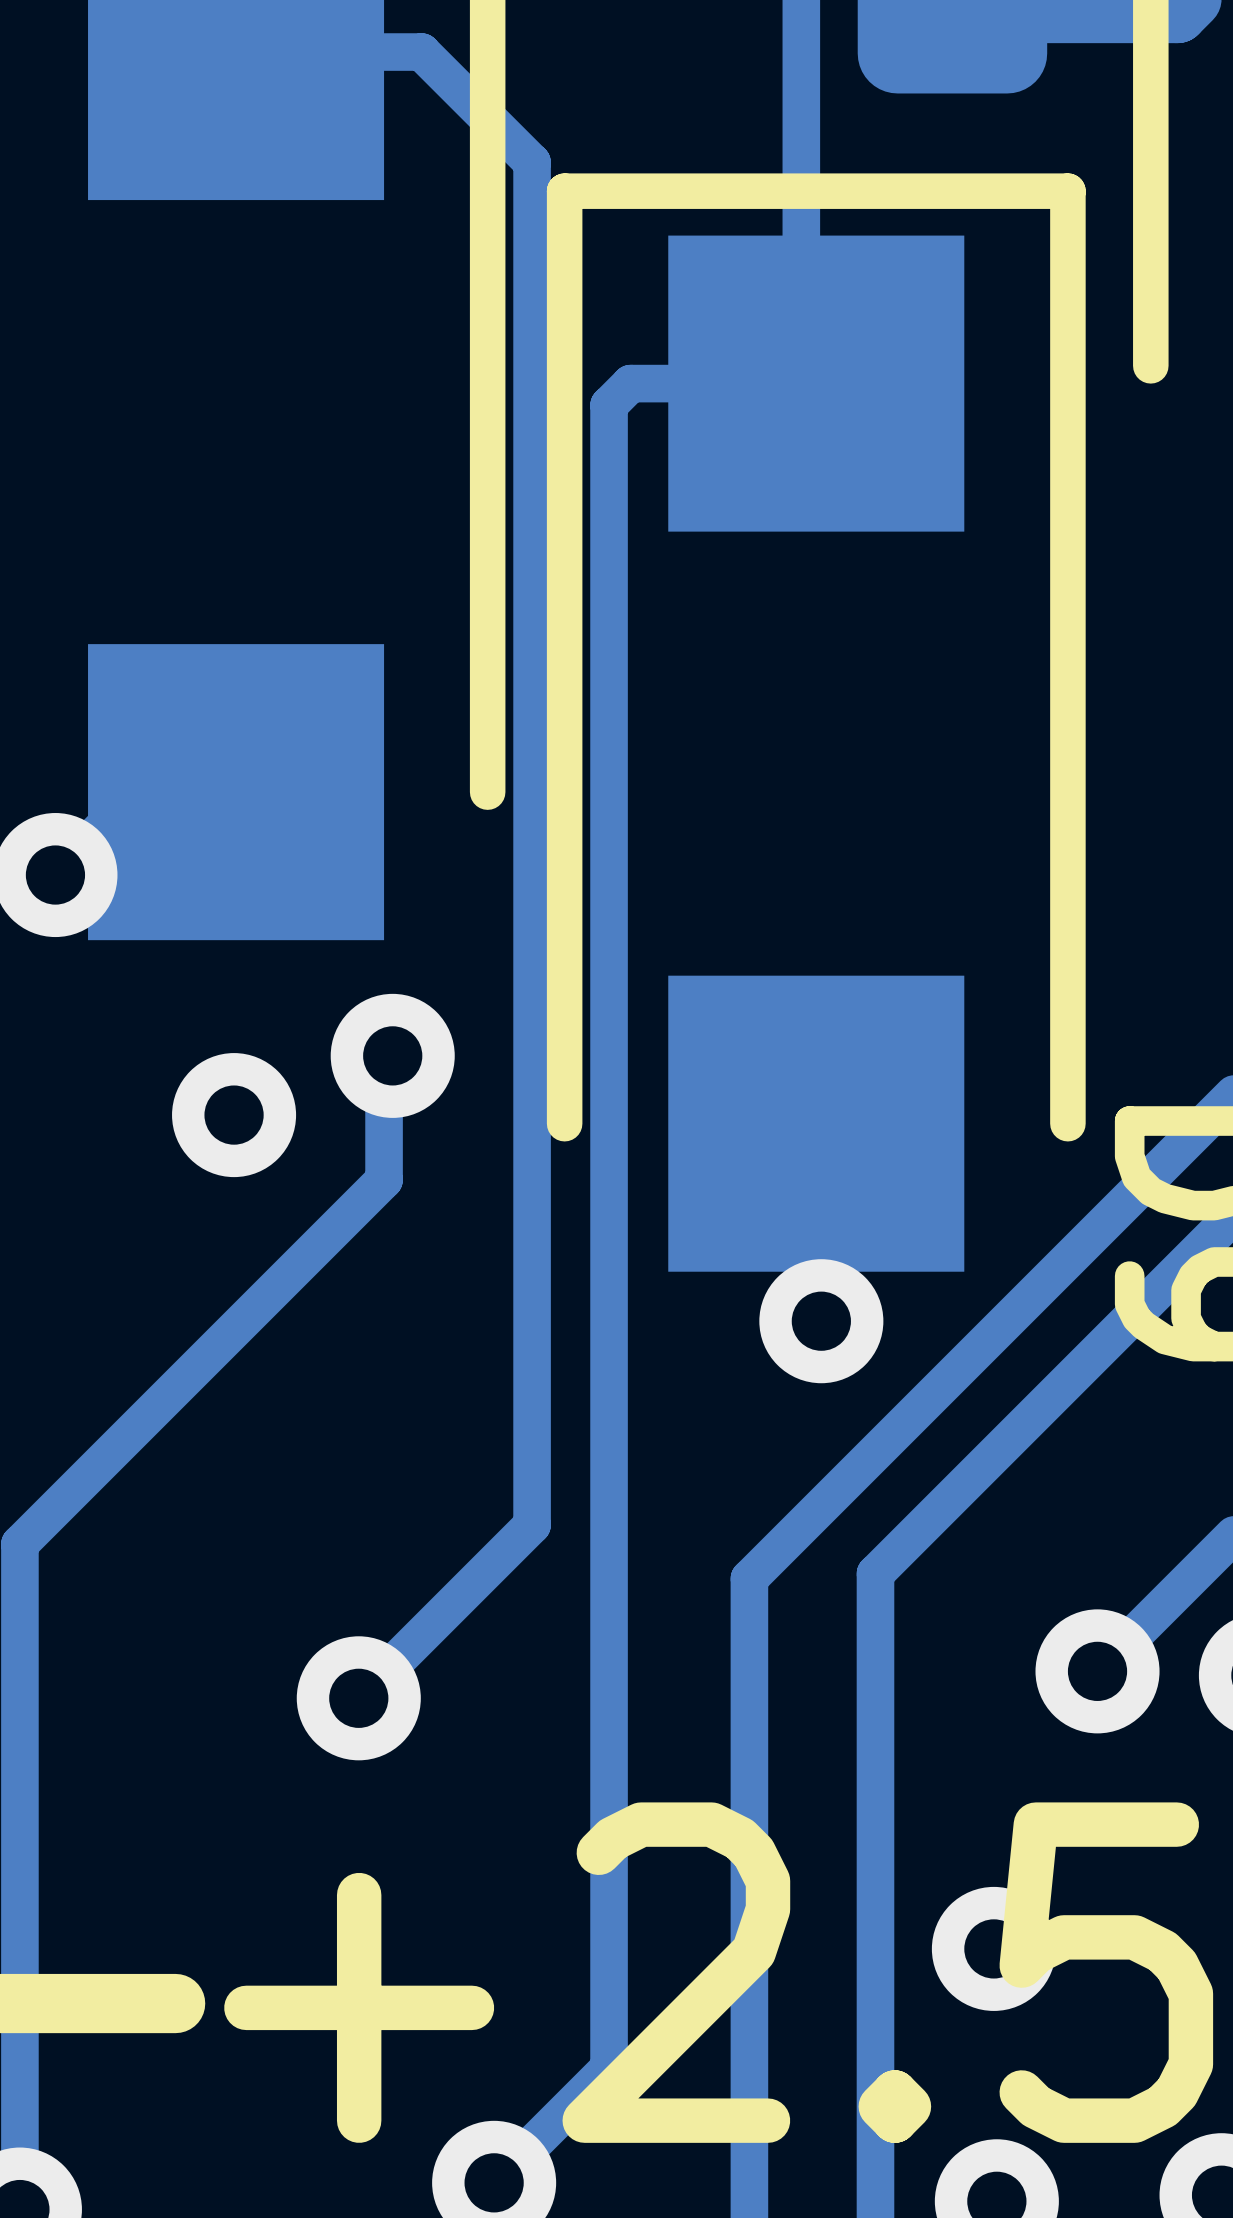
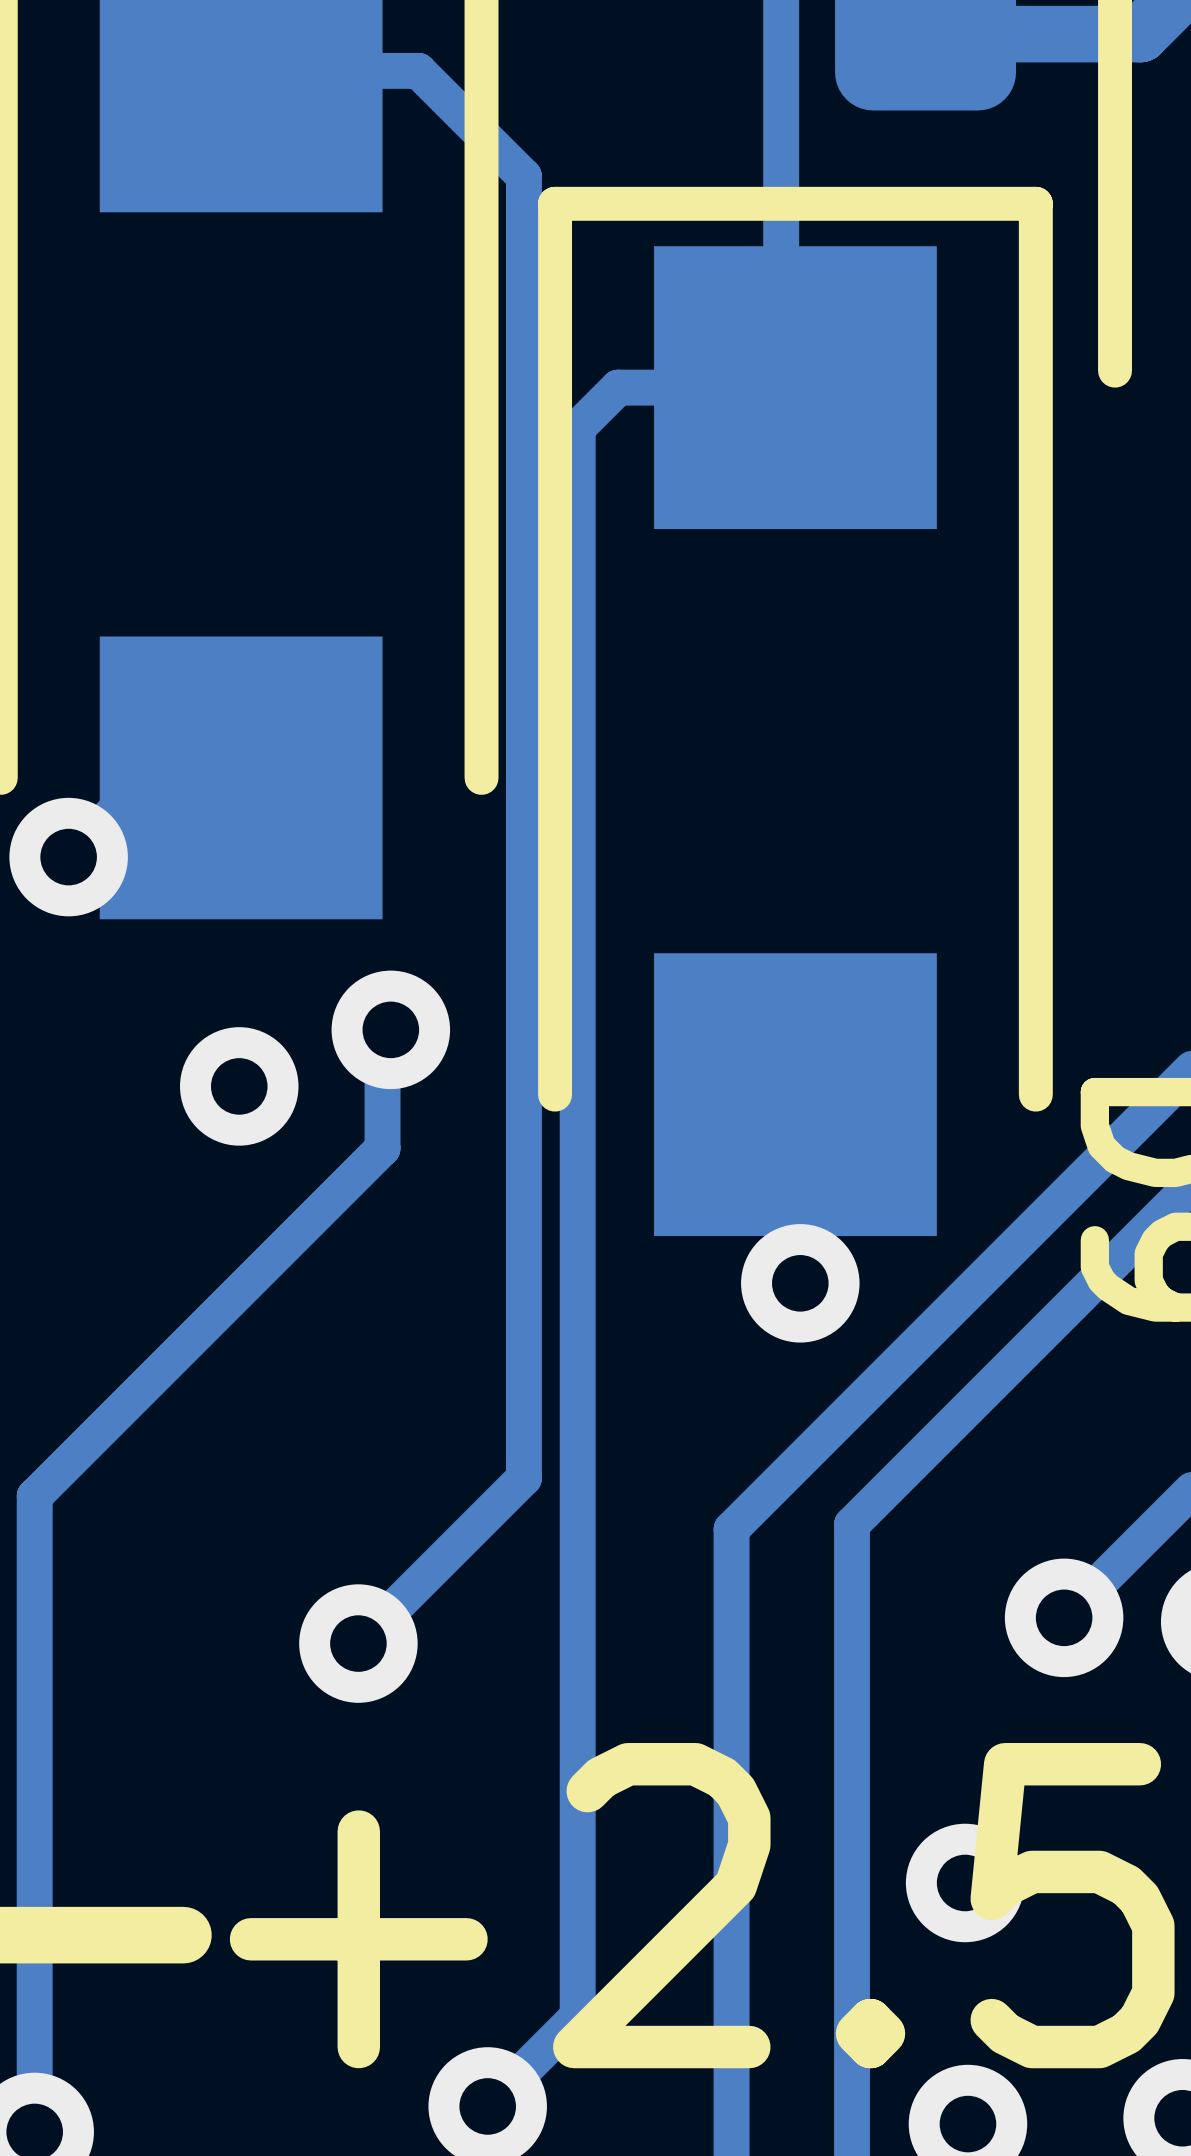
track: (609, 405) (609, 2067) (588, 2088) -> (597, 408) (577, 428) (577, 2016)

